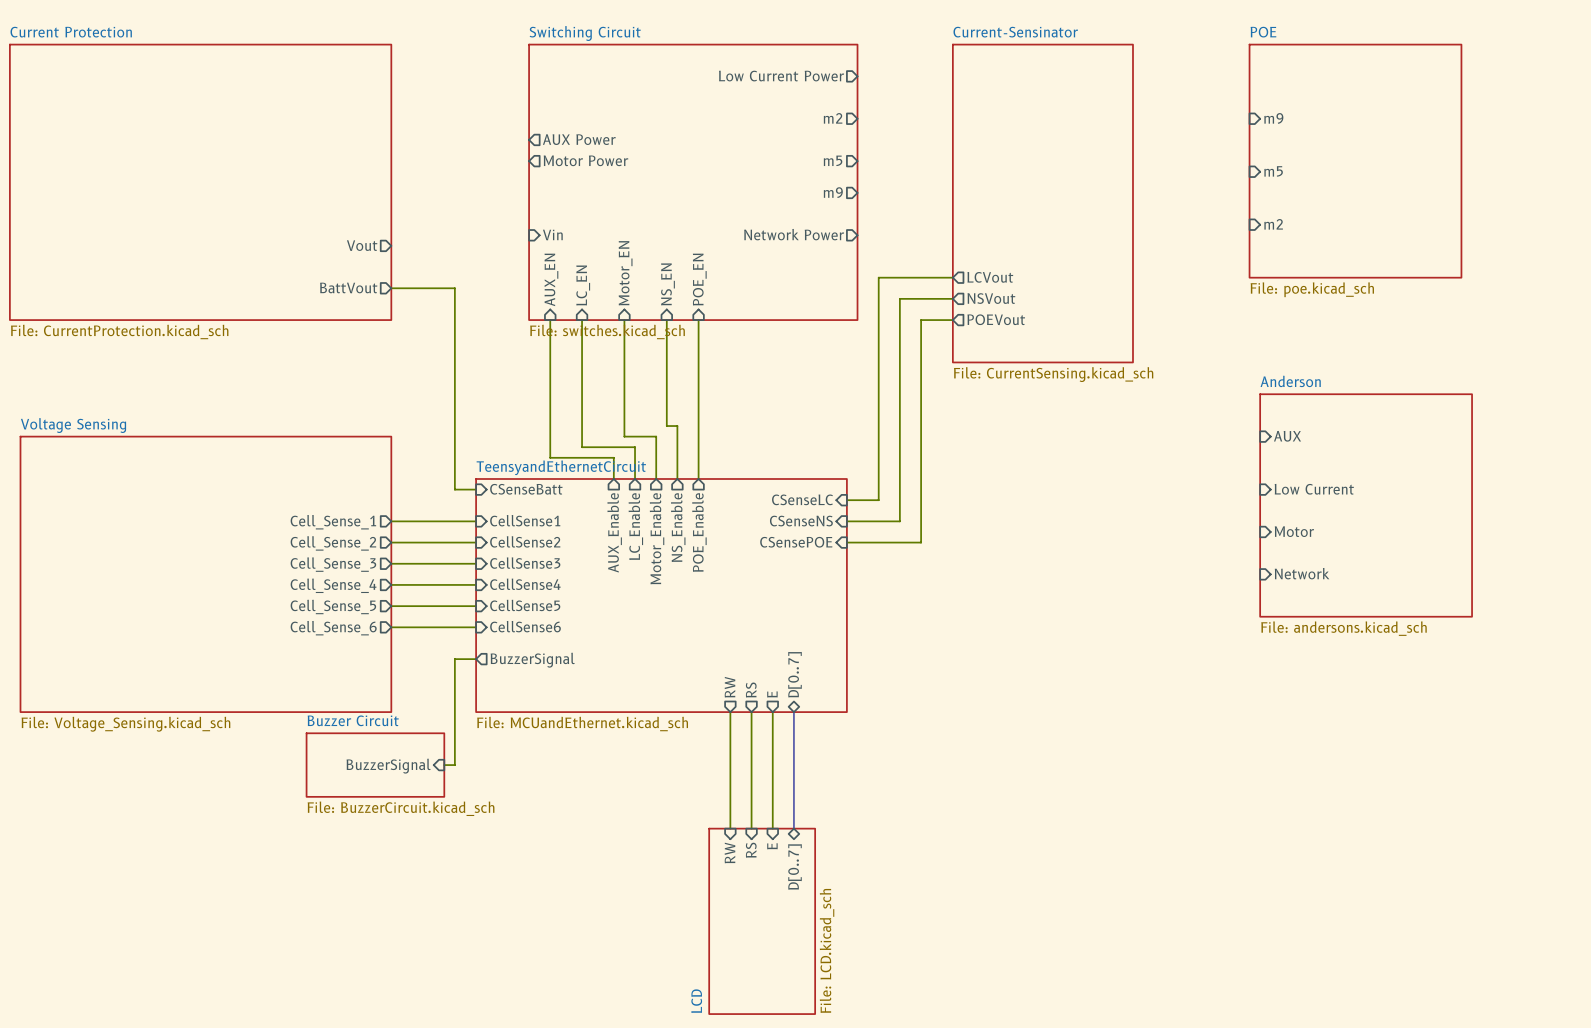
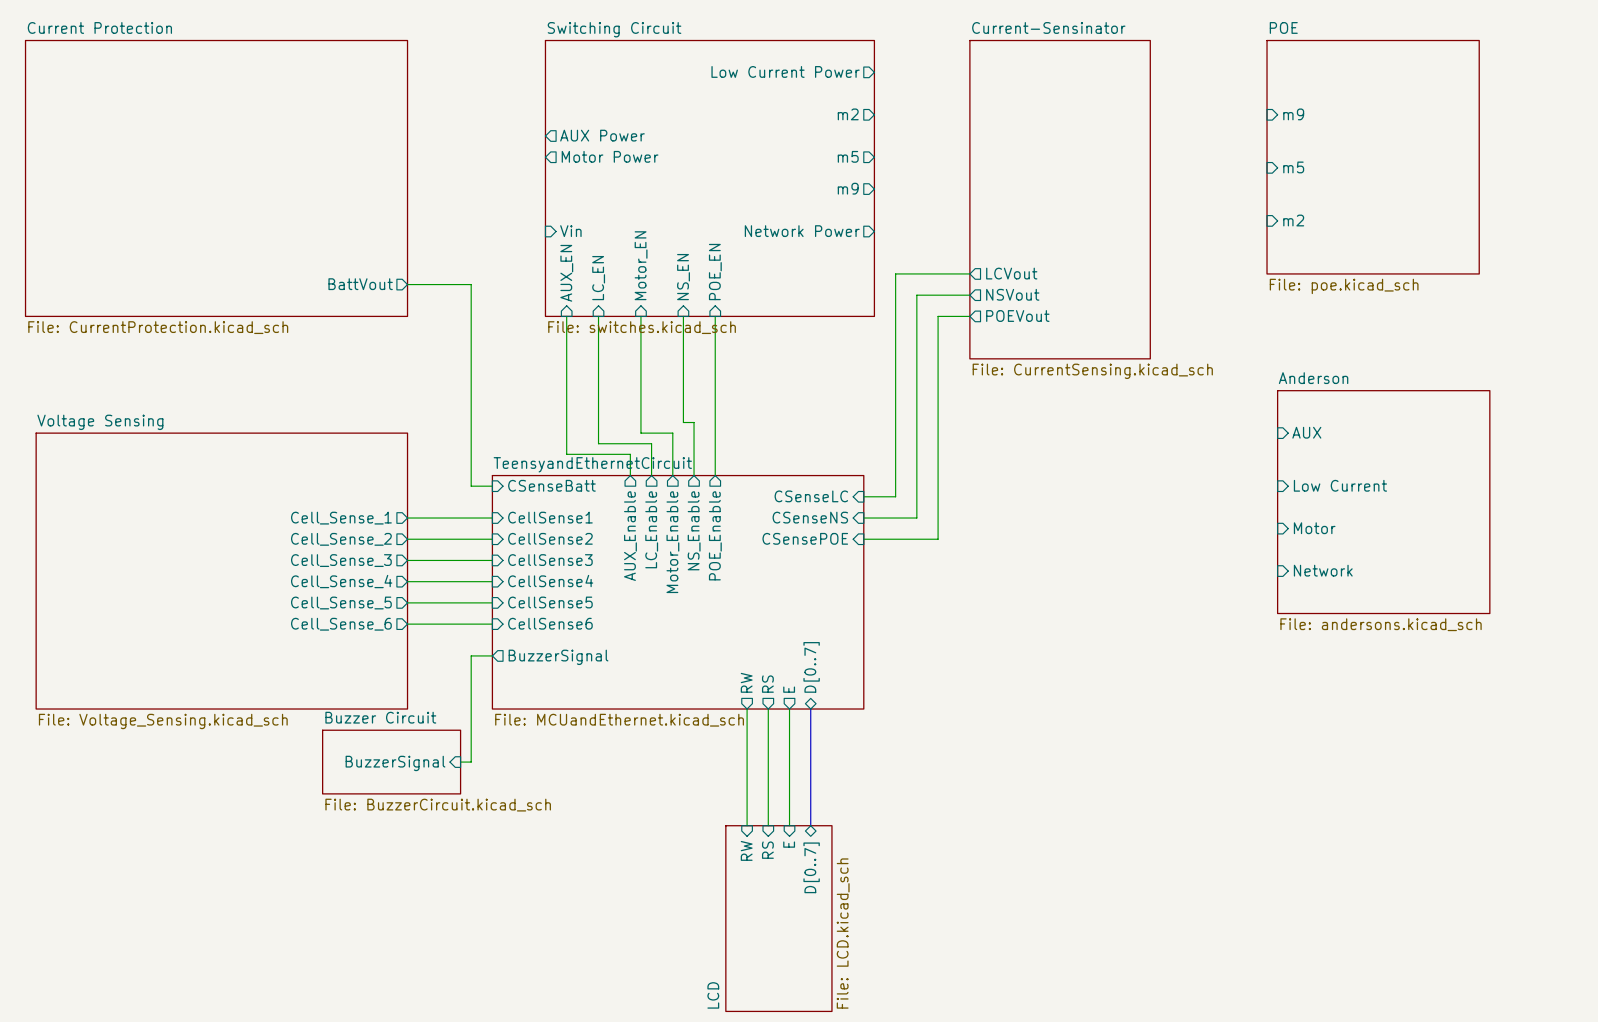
sheet pin: Vout (362, 245) -> none

